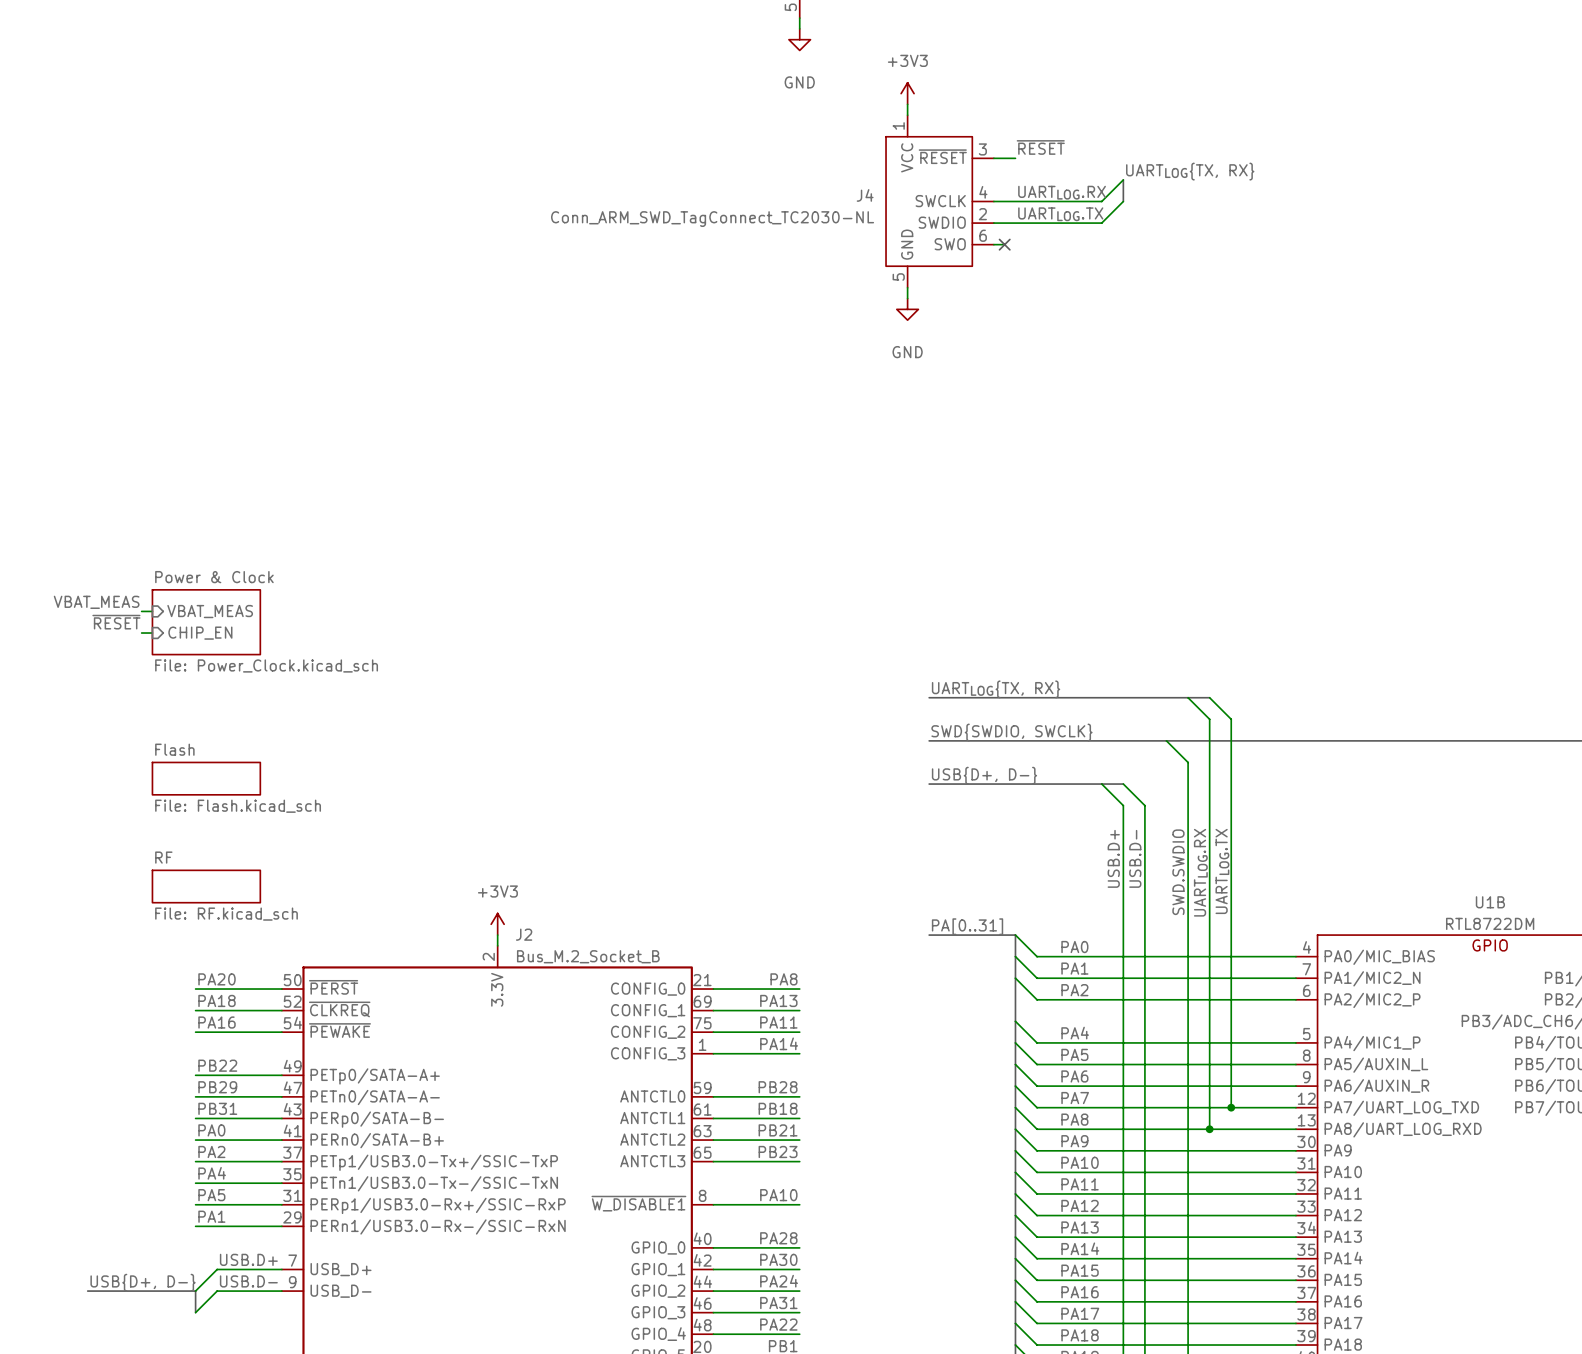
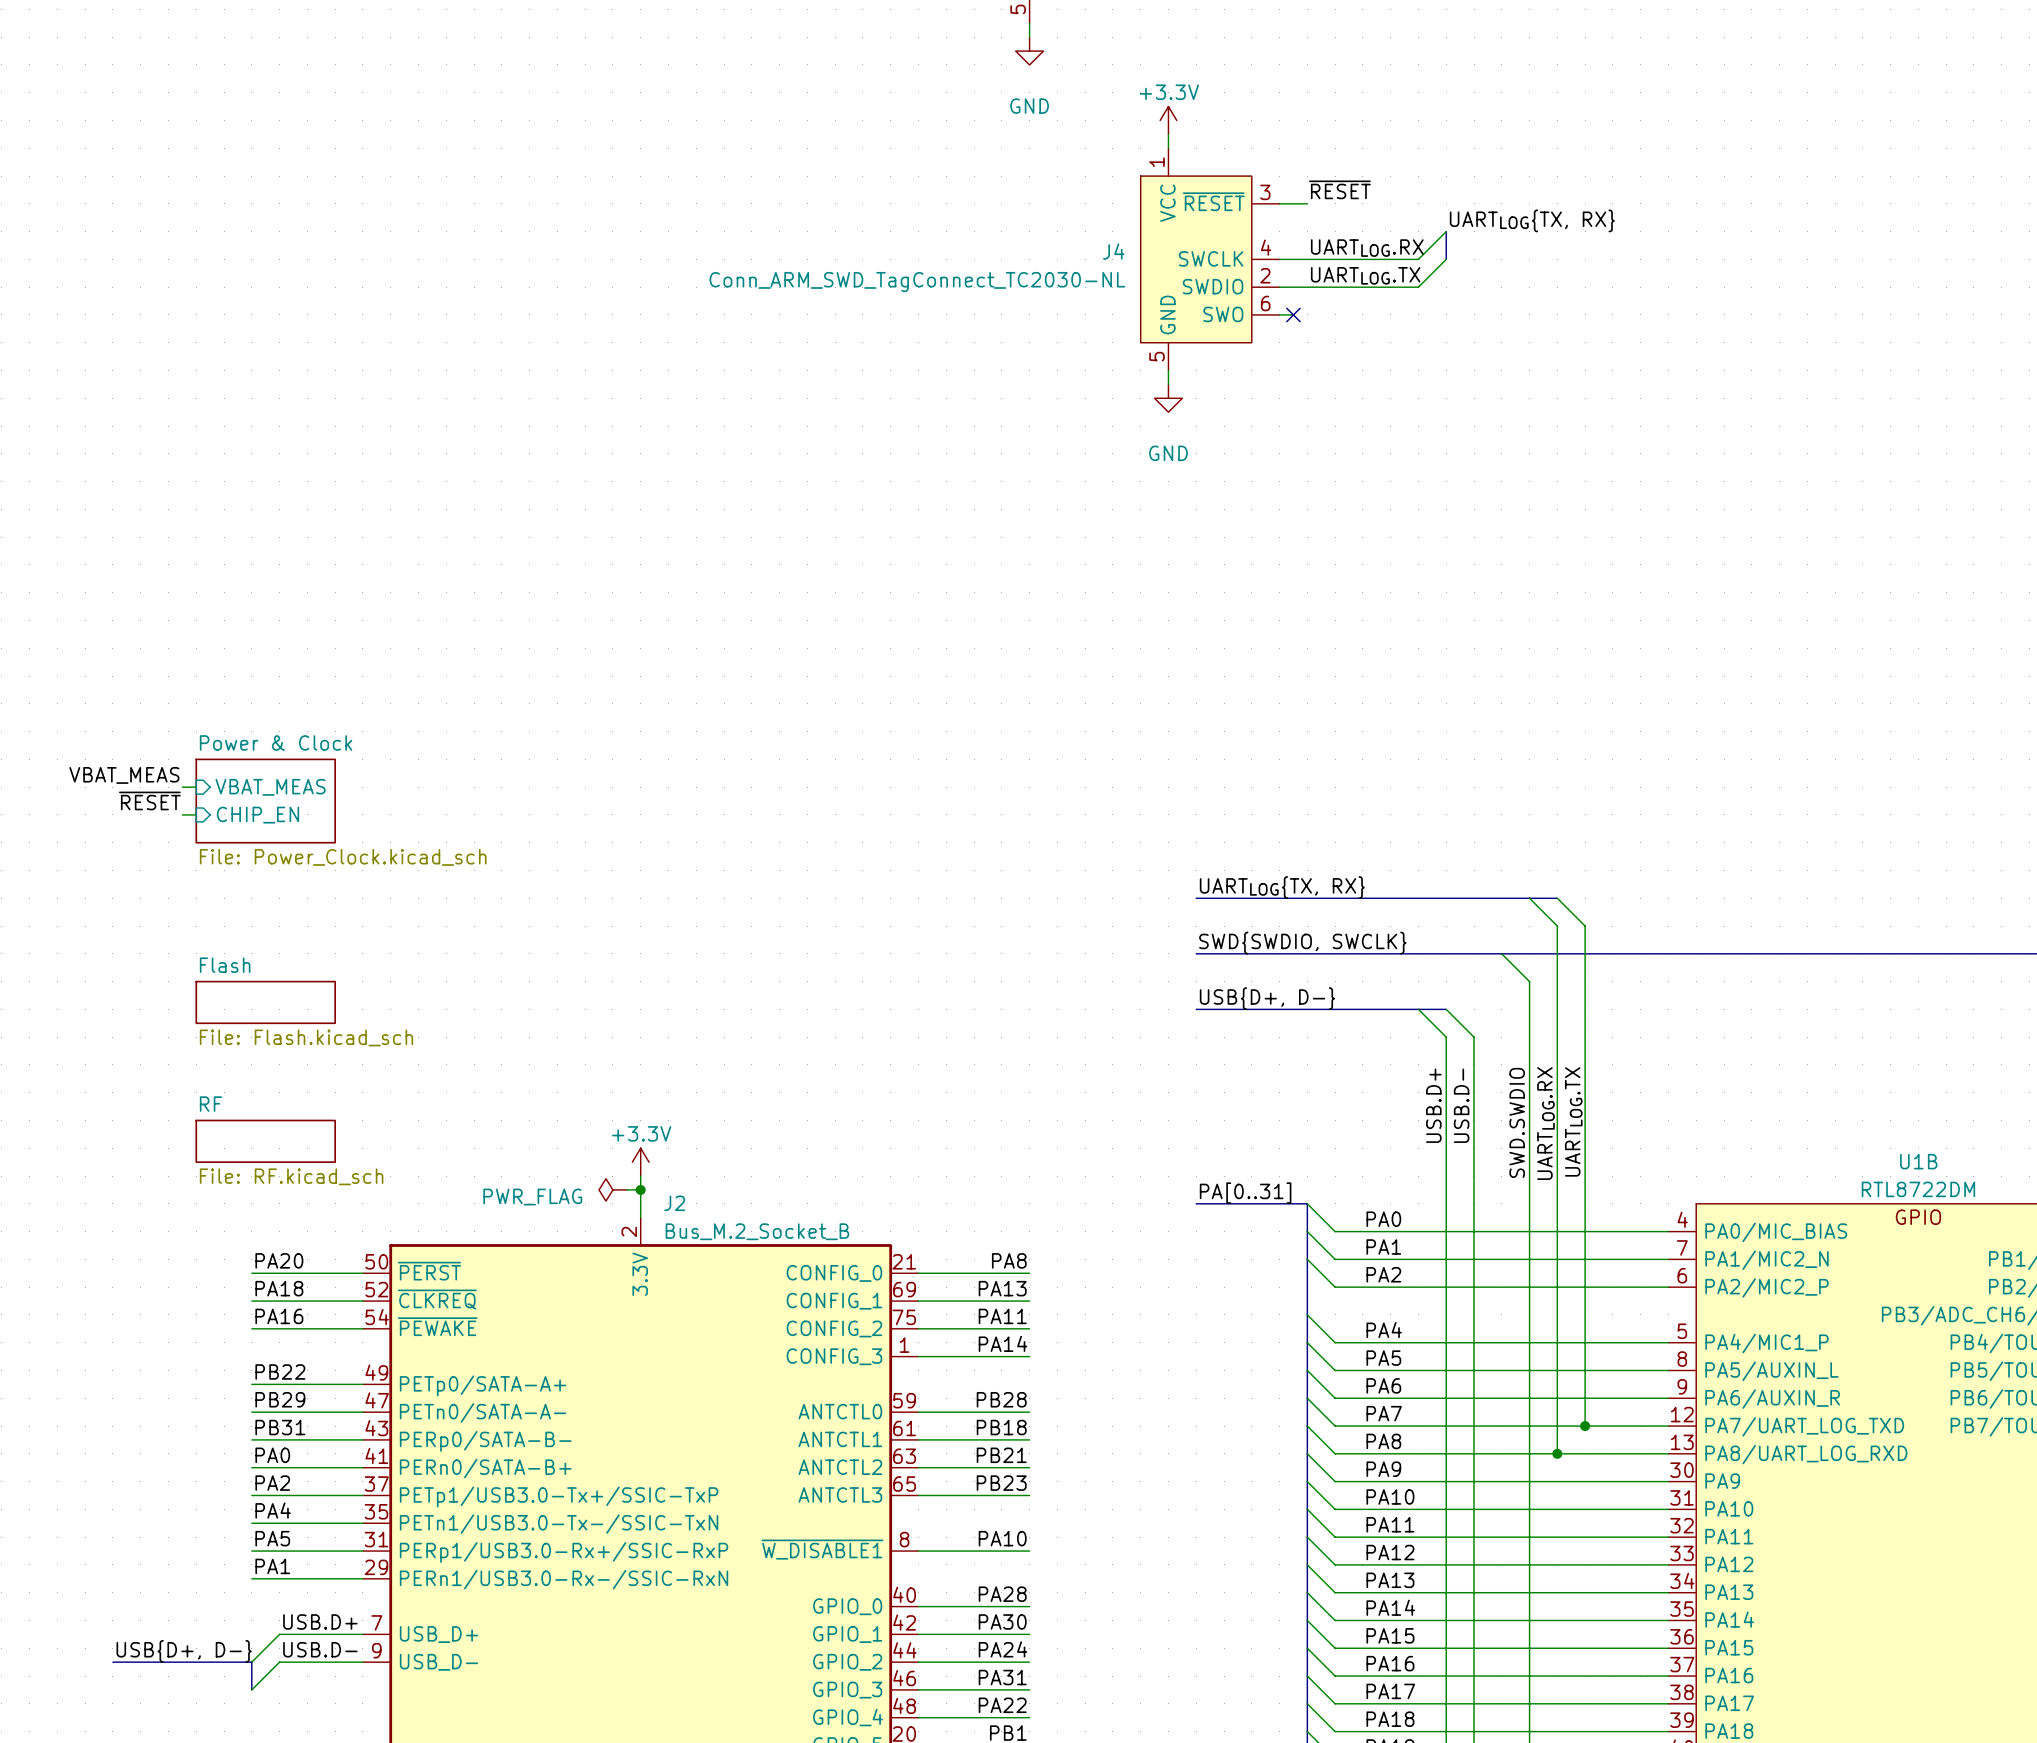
power symbol: +3V3 (907, 93) -> +3.3V (1168, 120)
power symbol: none -> +3.3V (640, 1162)
power symbol: none -> PWR_FLAG (612, 1189)
wire: none -> (626, 1189) (640, 1189)
power symbol: +3V3 (497, 924) -> none
junction: none -> (640, 1189)

